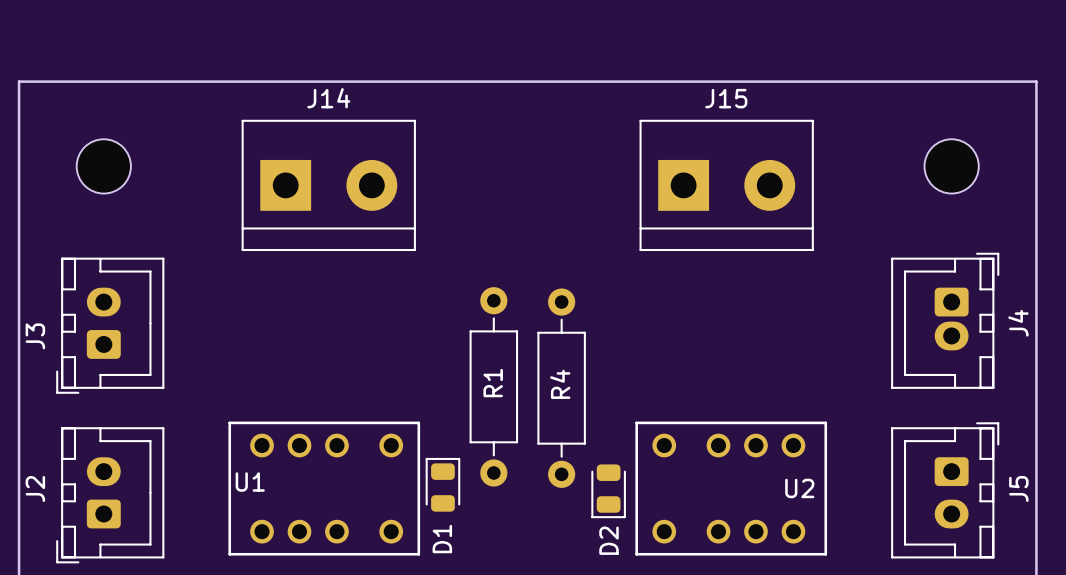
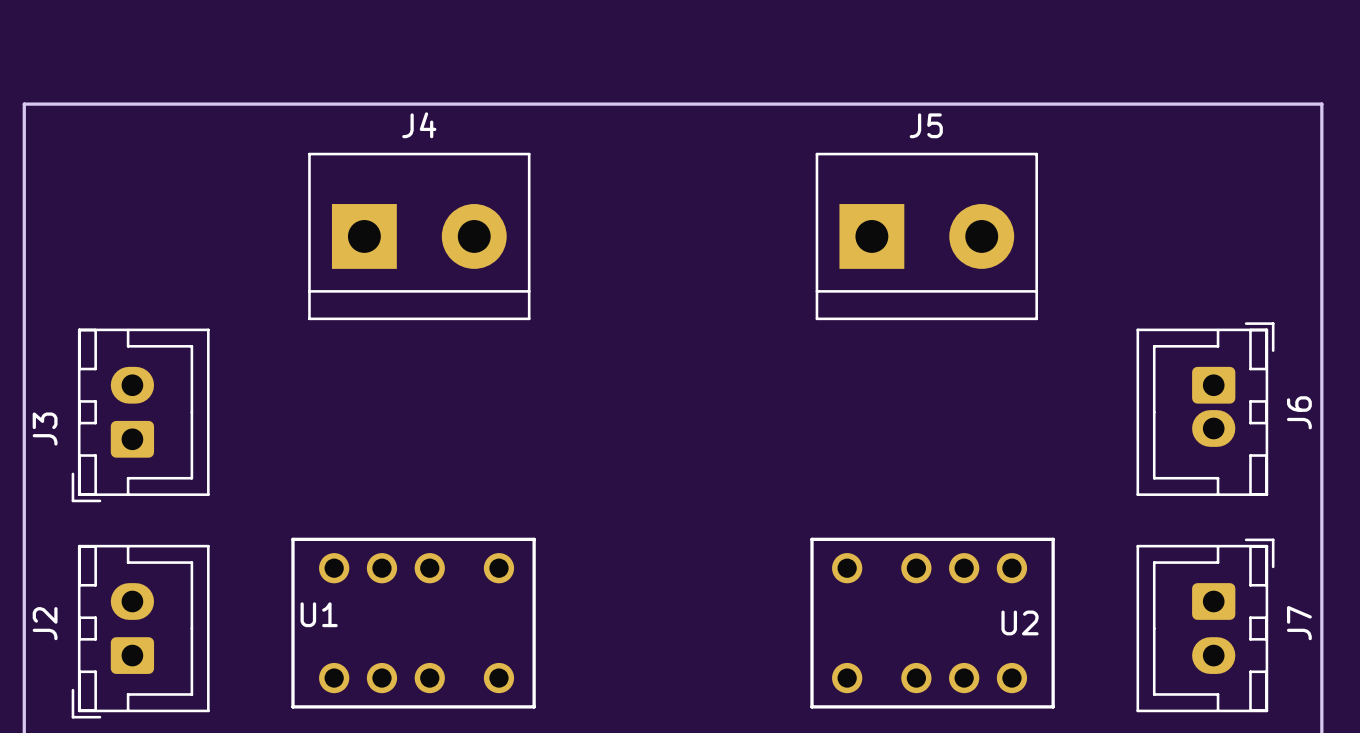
J14 name: J14 (328, 98) -> J4 (419, 125)
J15 name: J15 (726, 98) -> J5 (926, 125)
part: (103, 166) -> none
part: (951, 166) -> none
J4 name: J4 (1018, 323) -> J6 (1299, 412)
R1: (493, 386) -> none
R4: (561, 388) -> none
D1: (442, 484) -> none
J5 name: J5 (1018, 488) -> J7 (1299, 623)
D2: (608, 491) -> none

